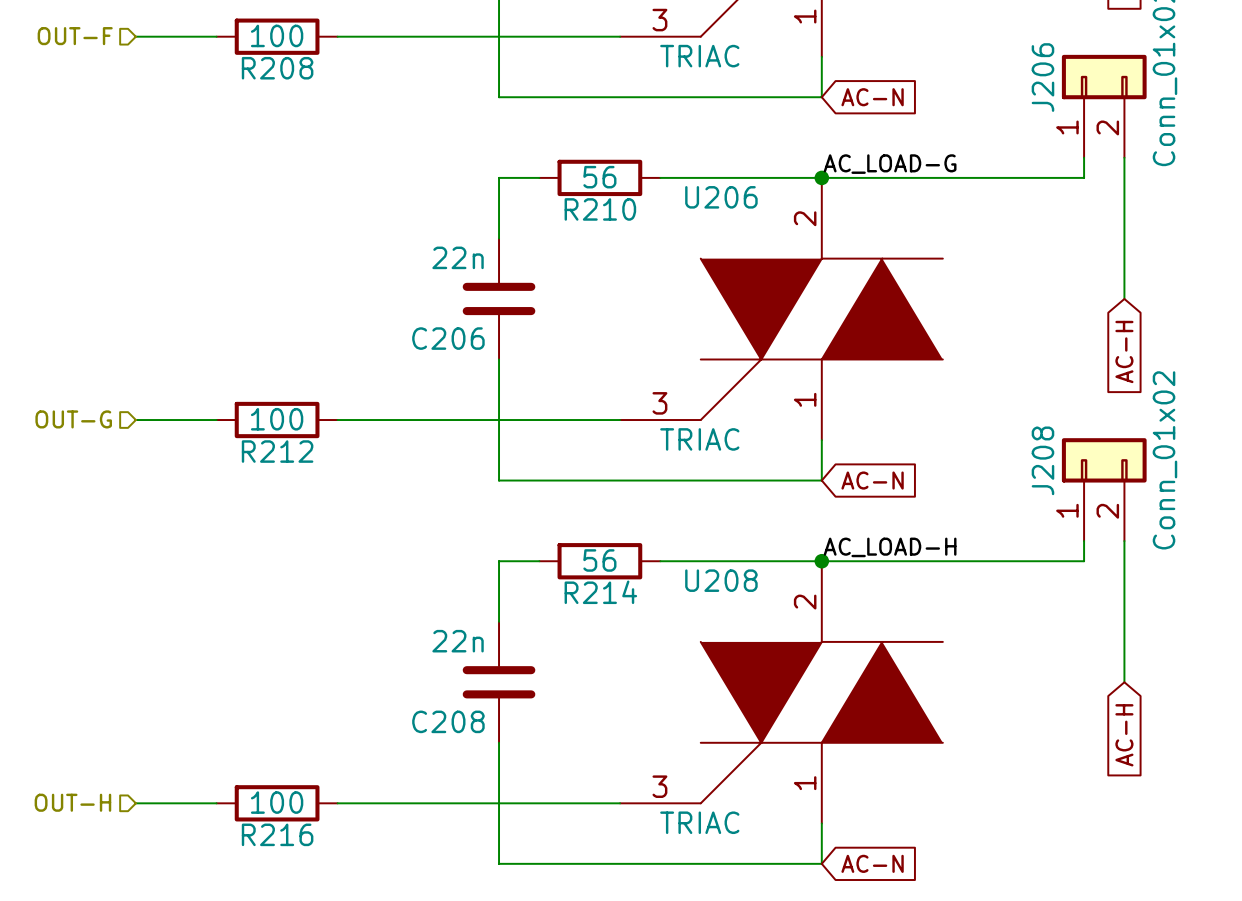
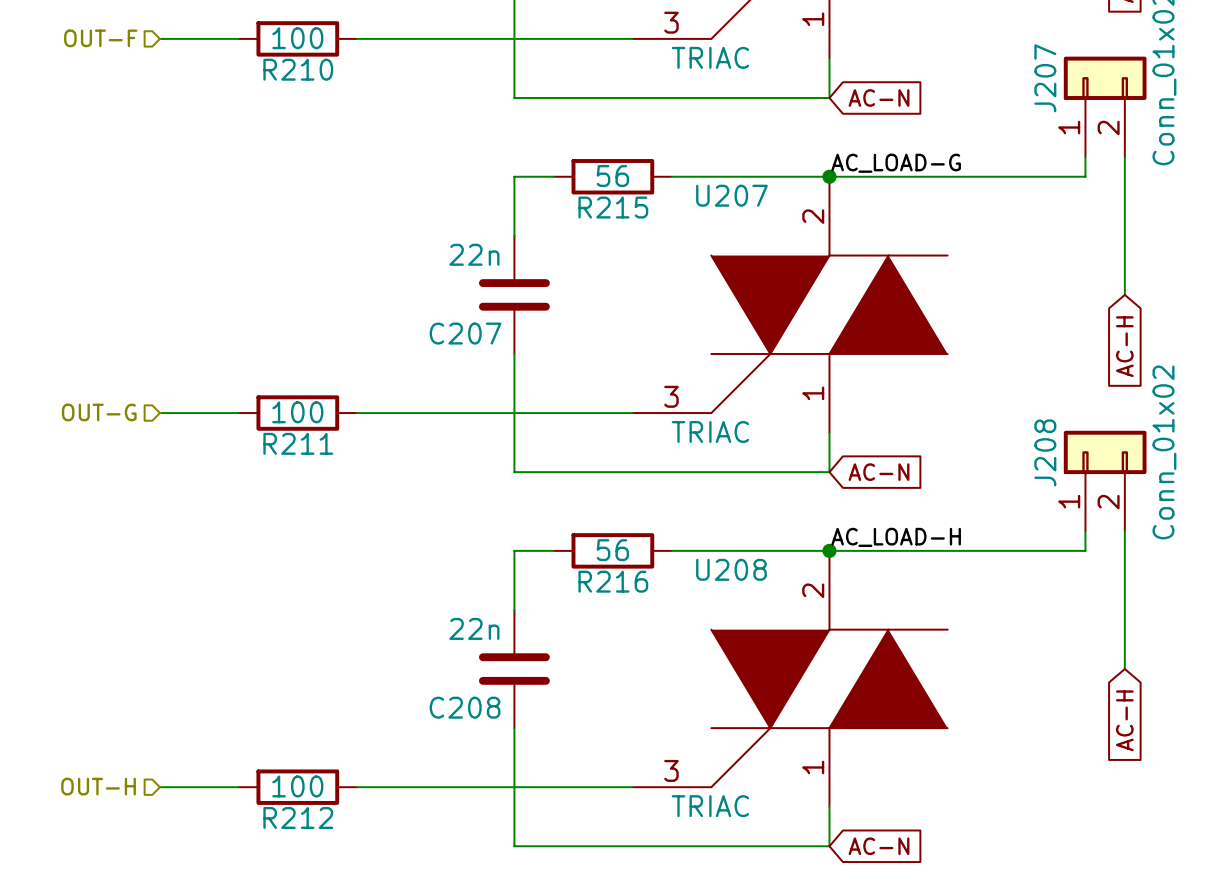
R208 name: R208 (277, 68) -> R210 (298, 69)
J206 name: J206 (1042, 77) -> J207 (1045, 78)
U206 name: U206 (721, 197) -> U207 (731, 195)
R210 name: R210 (600, 209) -> R215 (613, 207)
C206 name: C206 (448, 338) -> C207 (465, 333)
R212 name: R212 (277, 451) -> R211 (298, 443)
R214 name: R214 (600, 592) -> R216 (613, 581)
R216 name: R216 (277, 834) -> R212 (298, 817)

